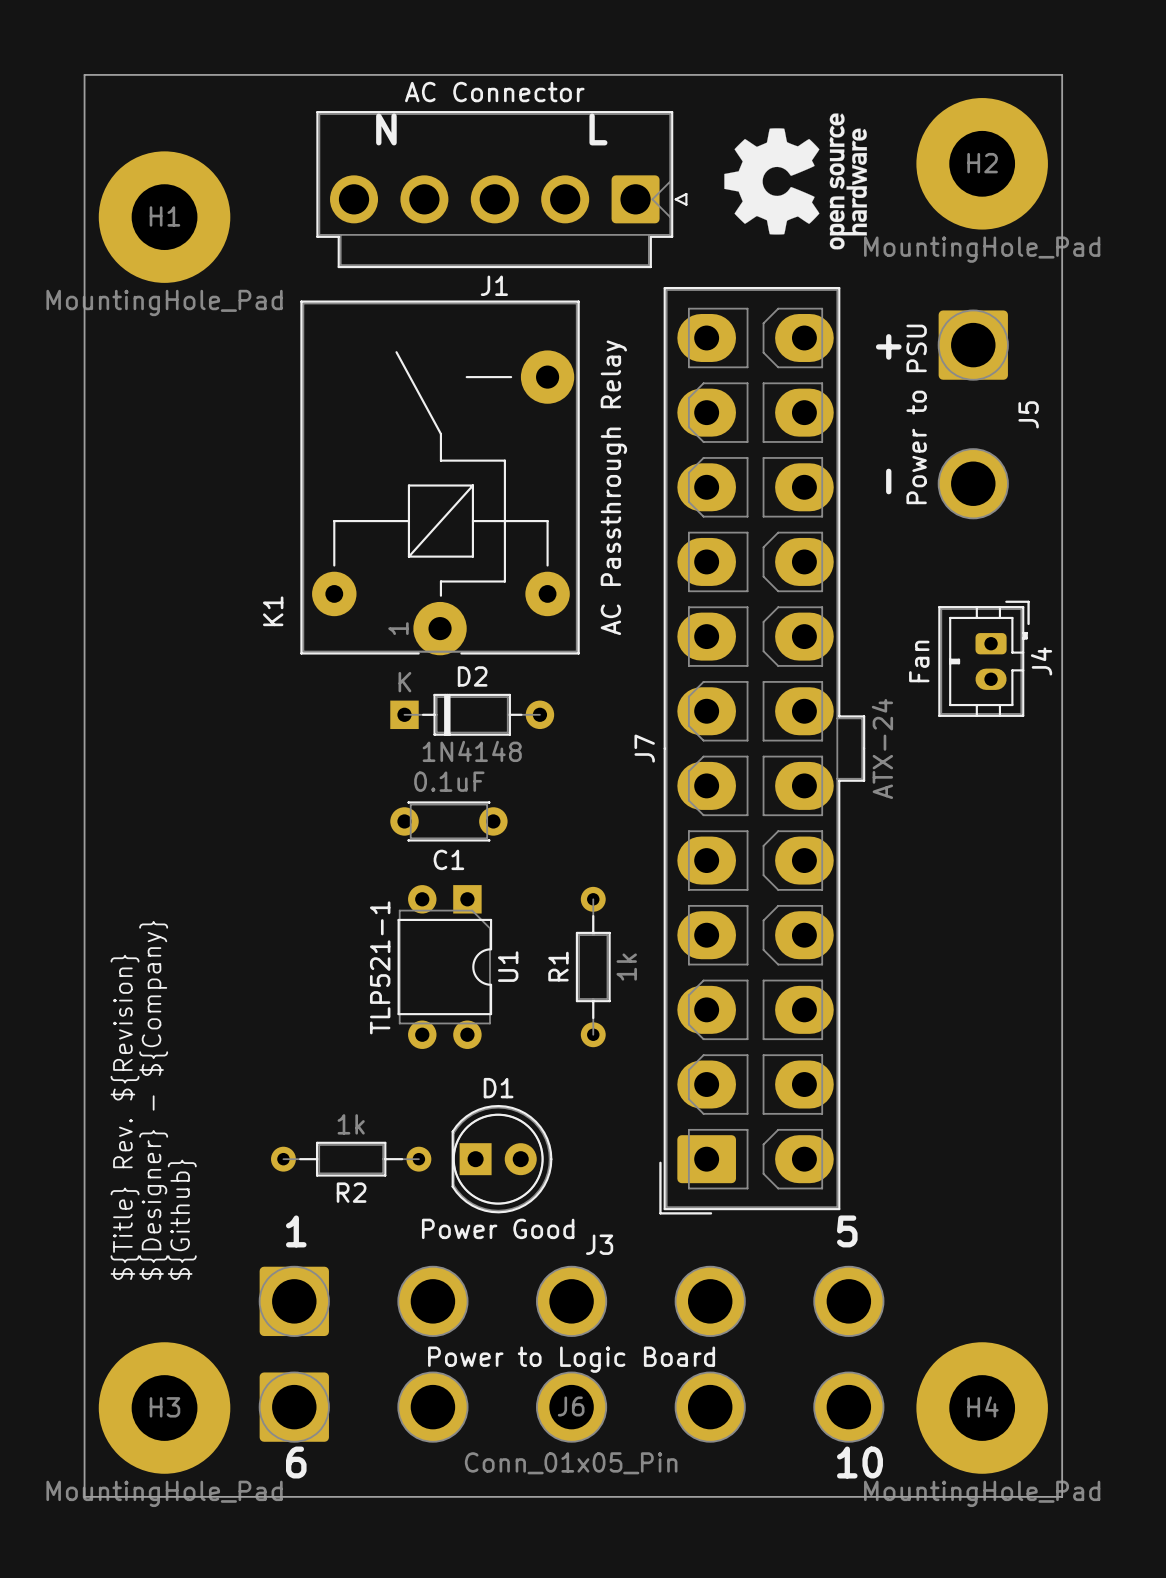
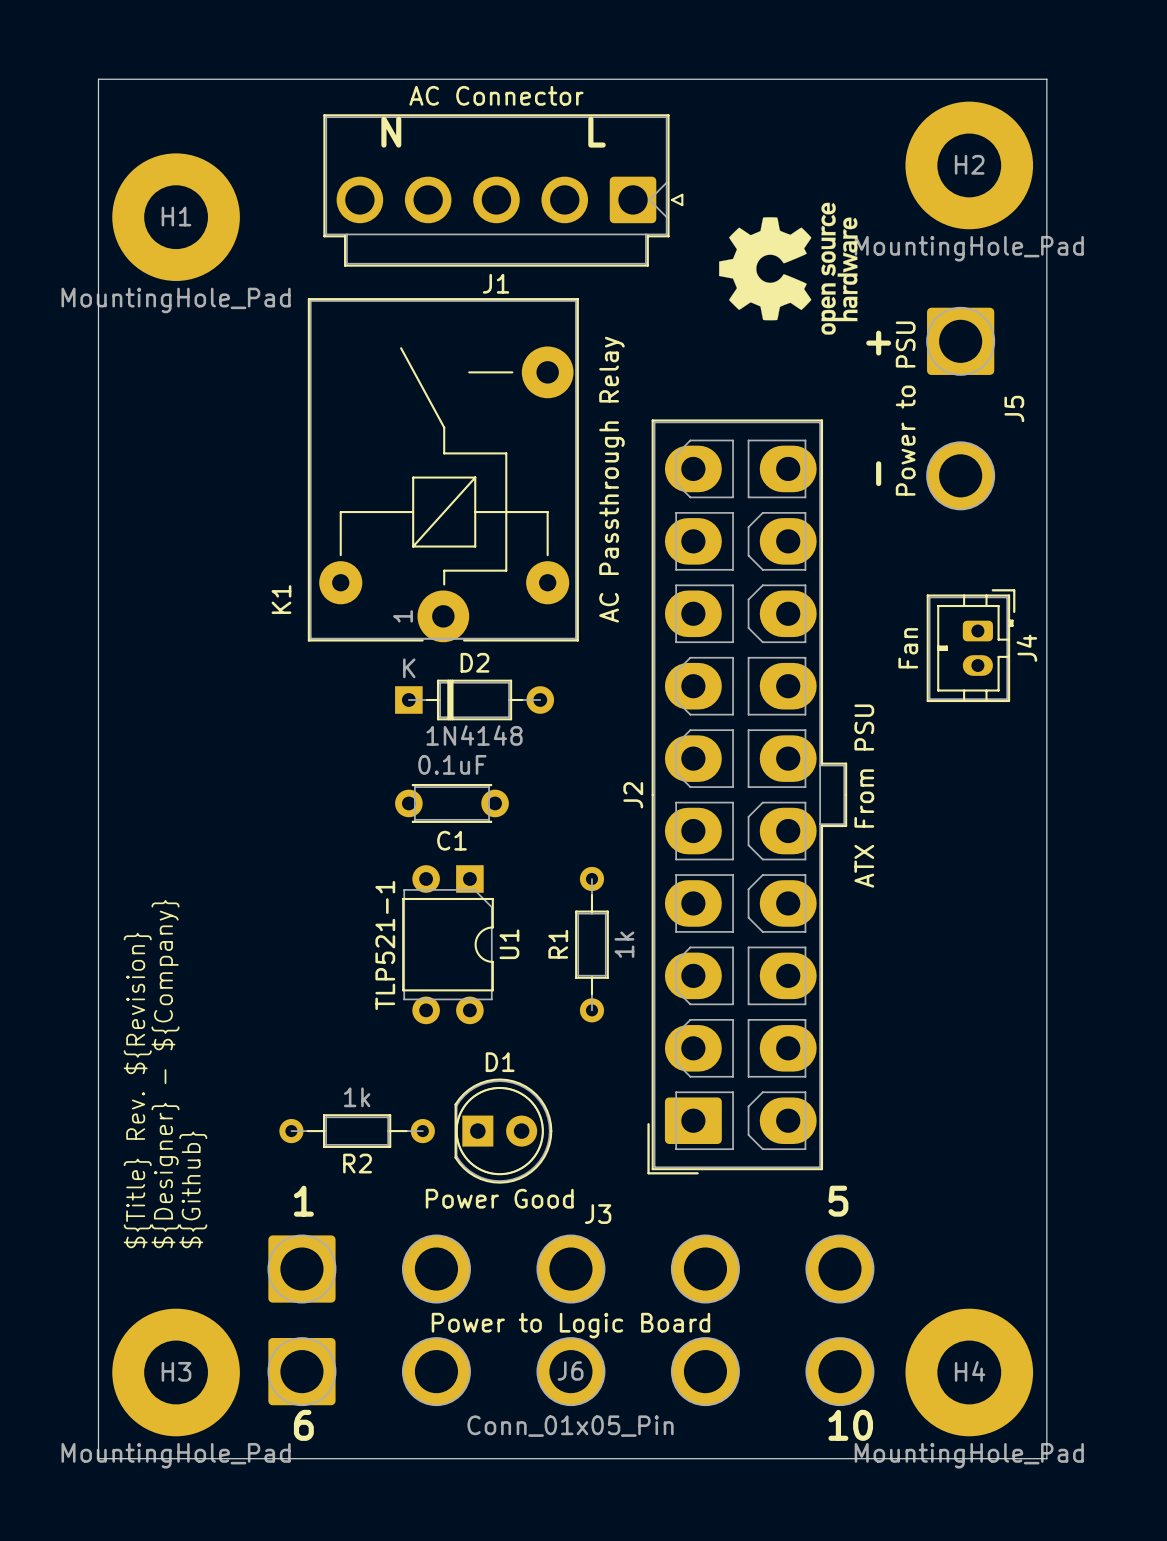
drawing position: (795, 181) -> (788, 268)
J7: ATX-24 (762, 750) -> none
J2: none -> ATX From PSU (747, 796)

